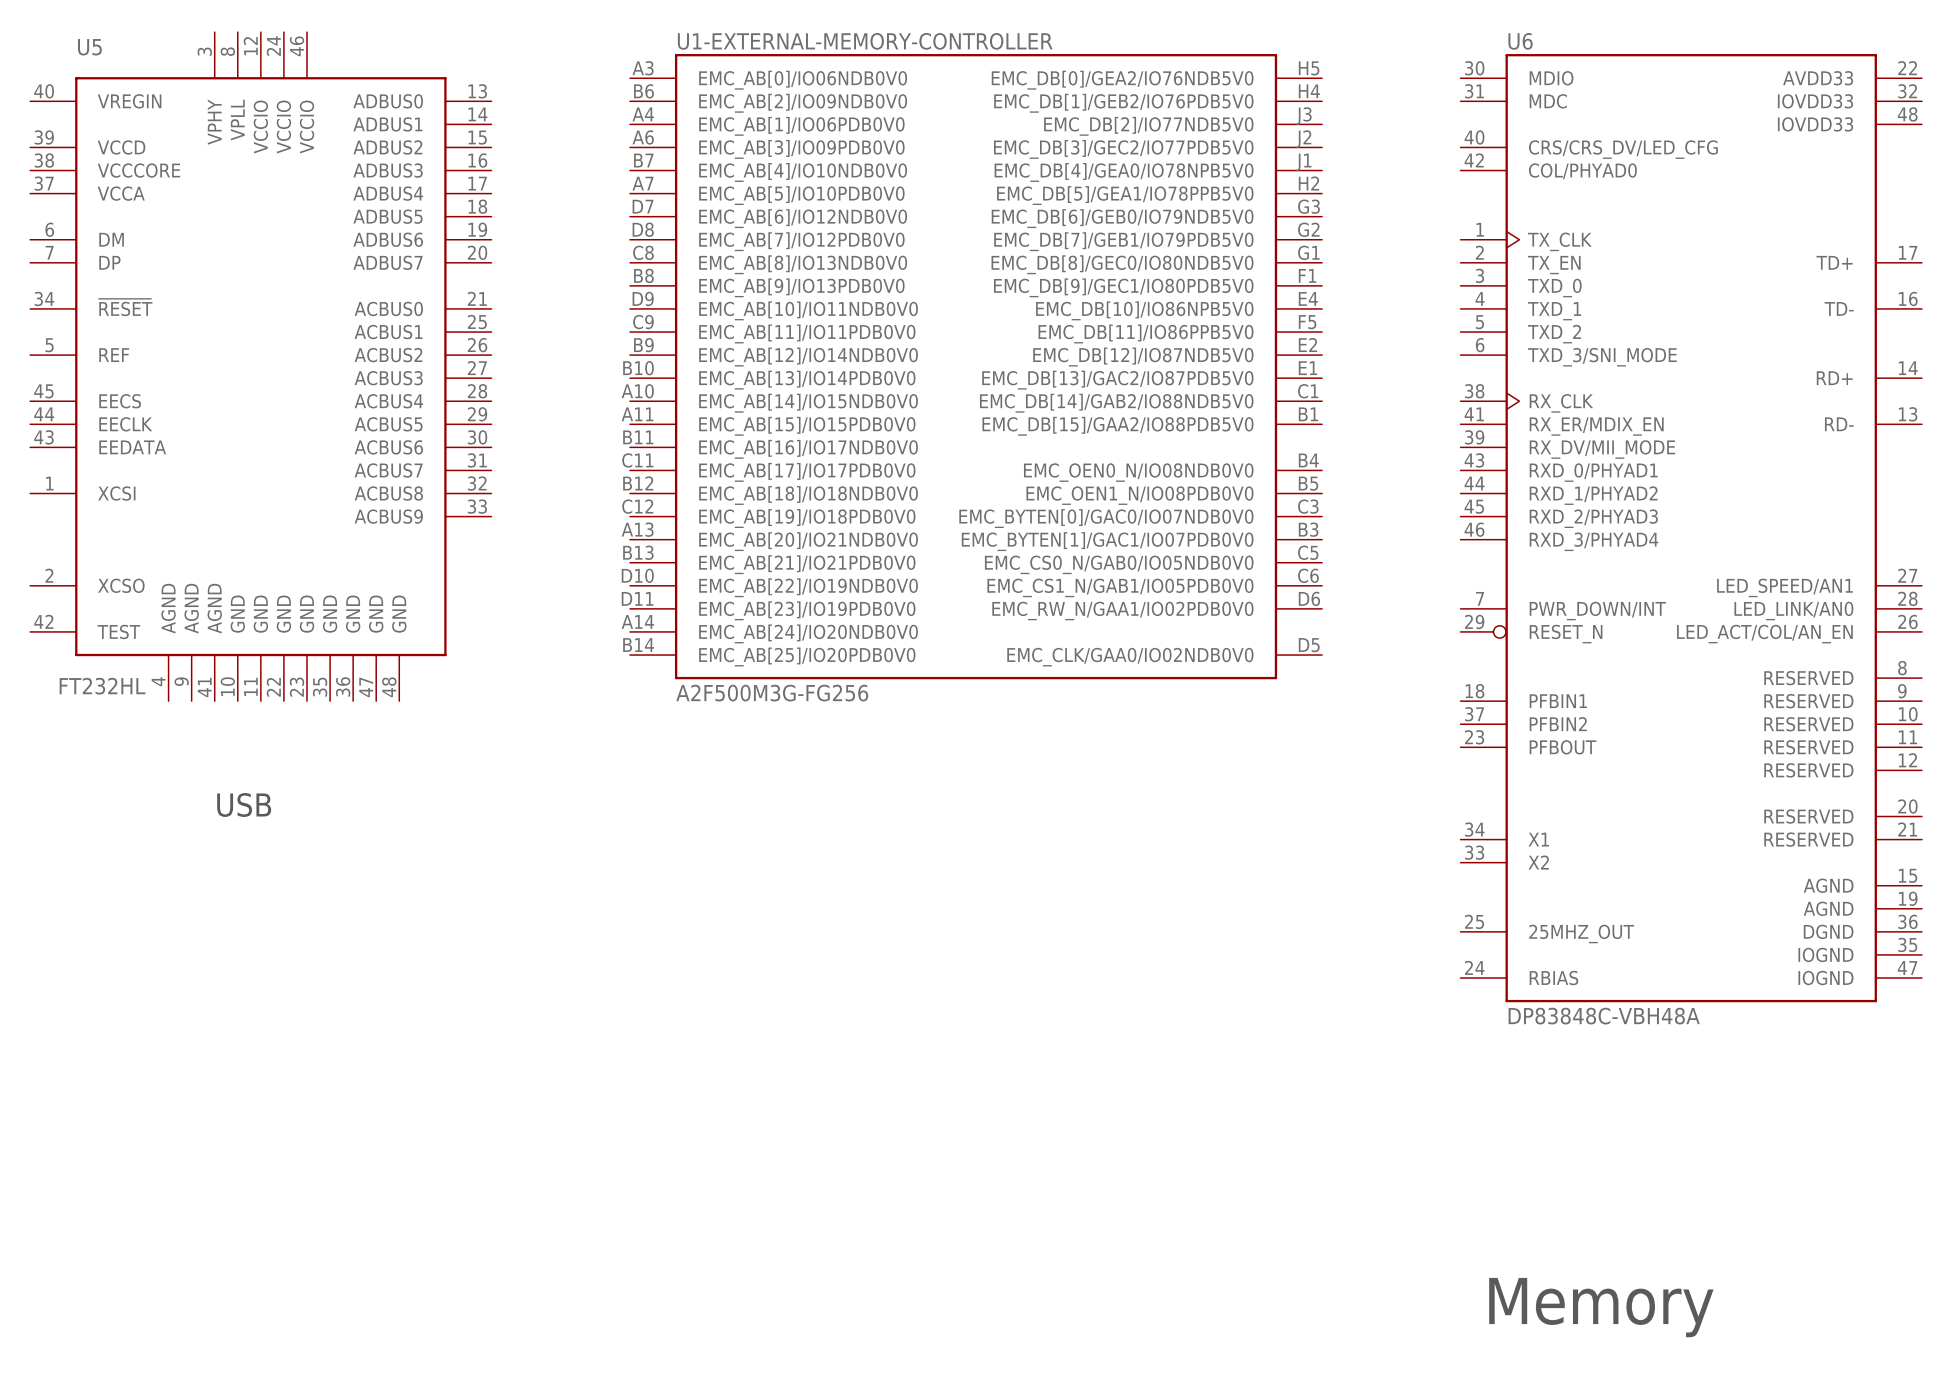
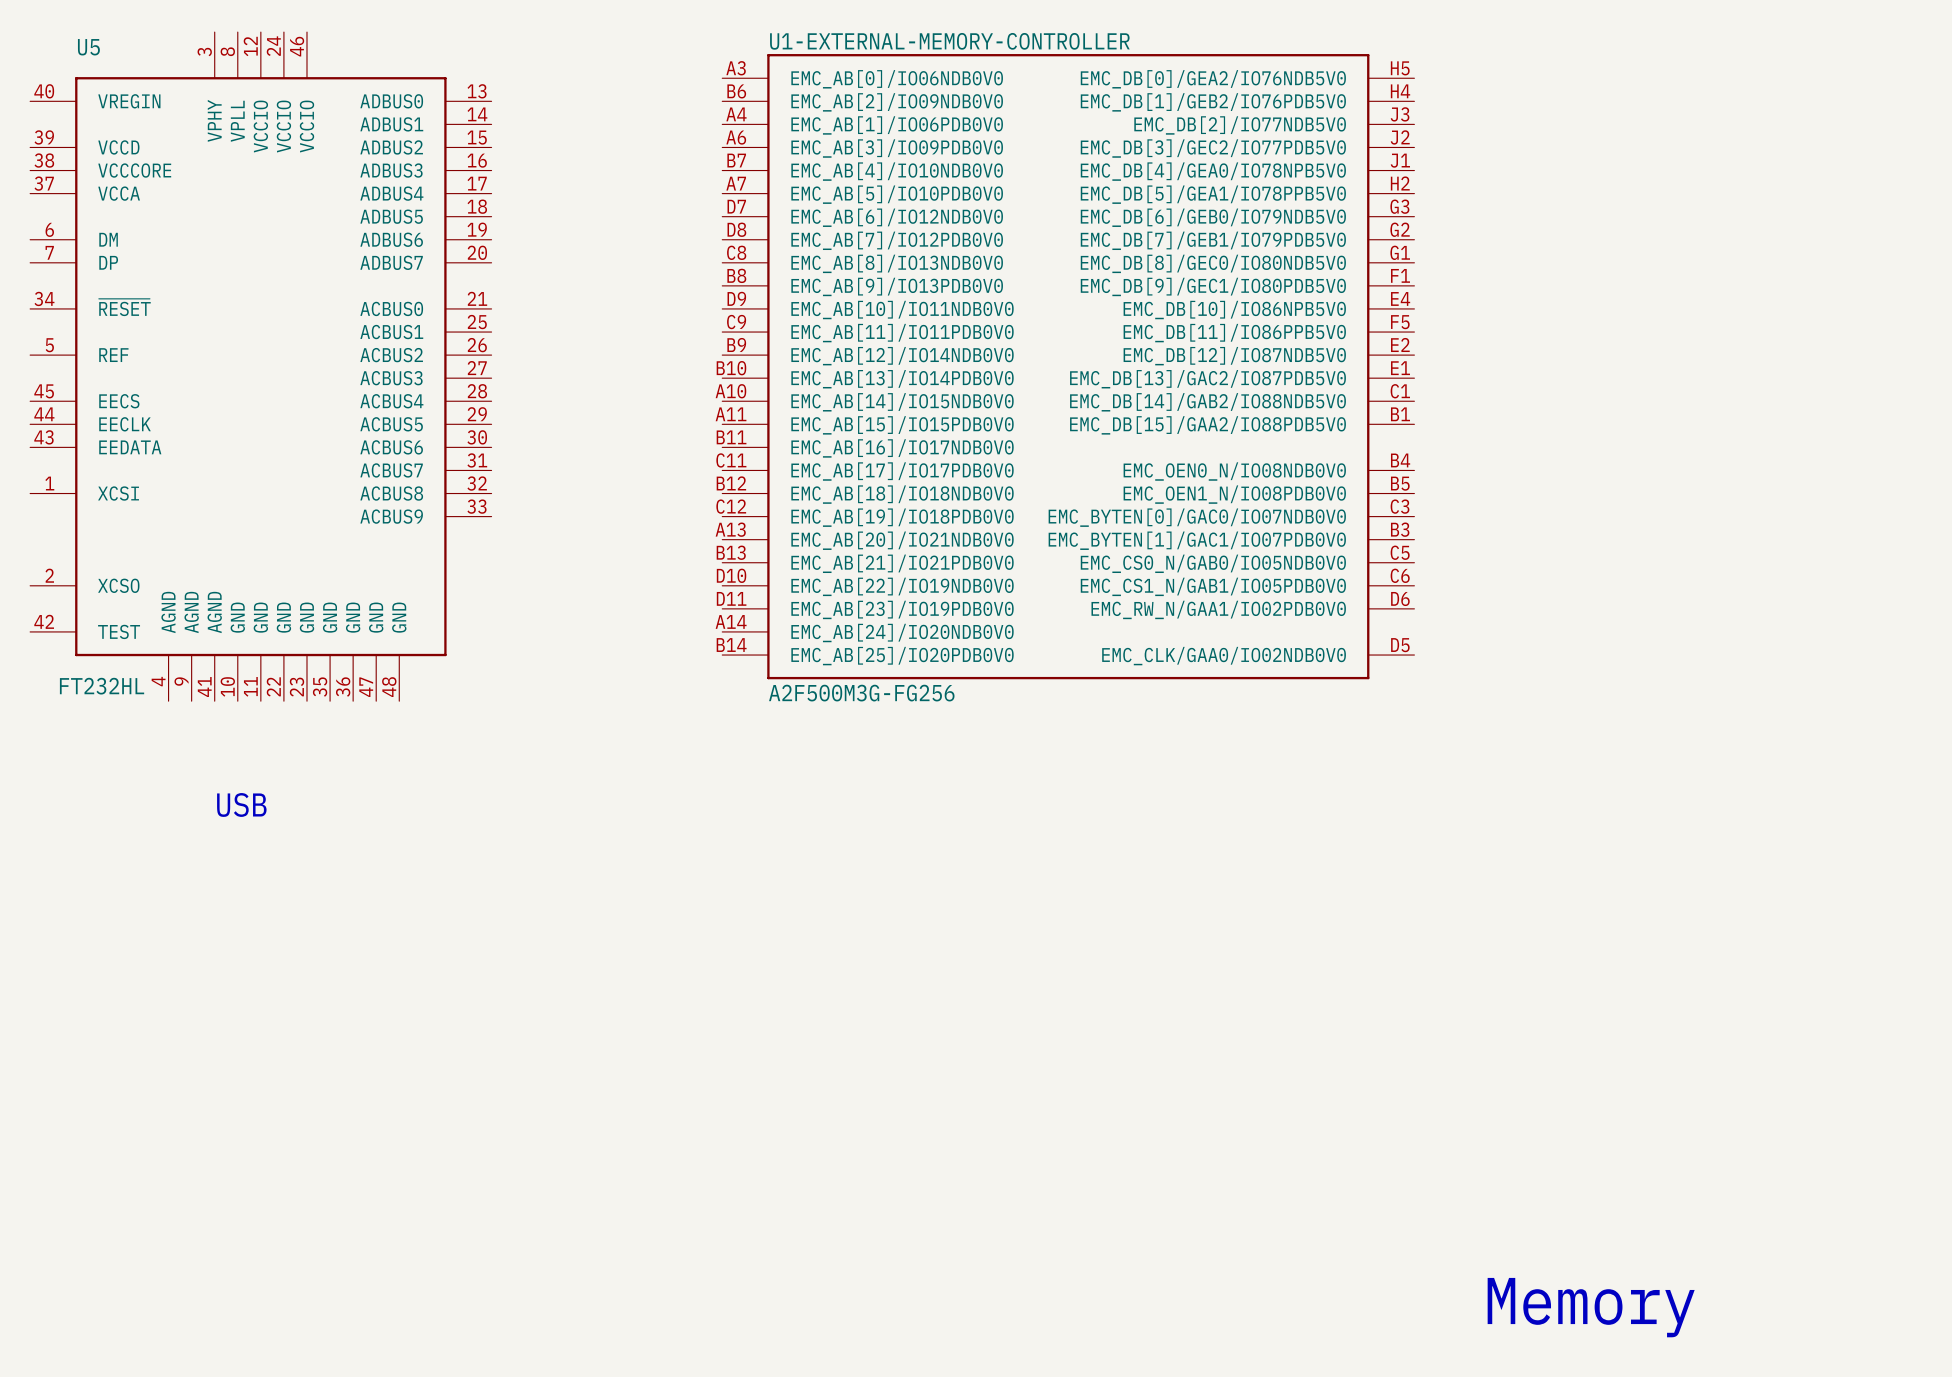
U1-EXTERNAL-MEMORY-CONTROLLER position: (976, 366) -> (1068, 366)
U6: DP83848C-VBH48A (1691, 528) -> none

